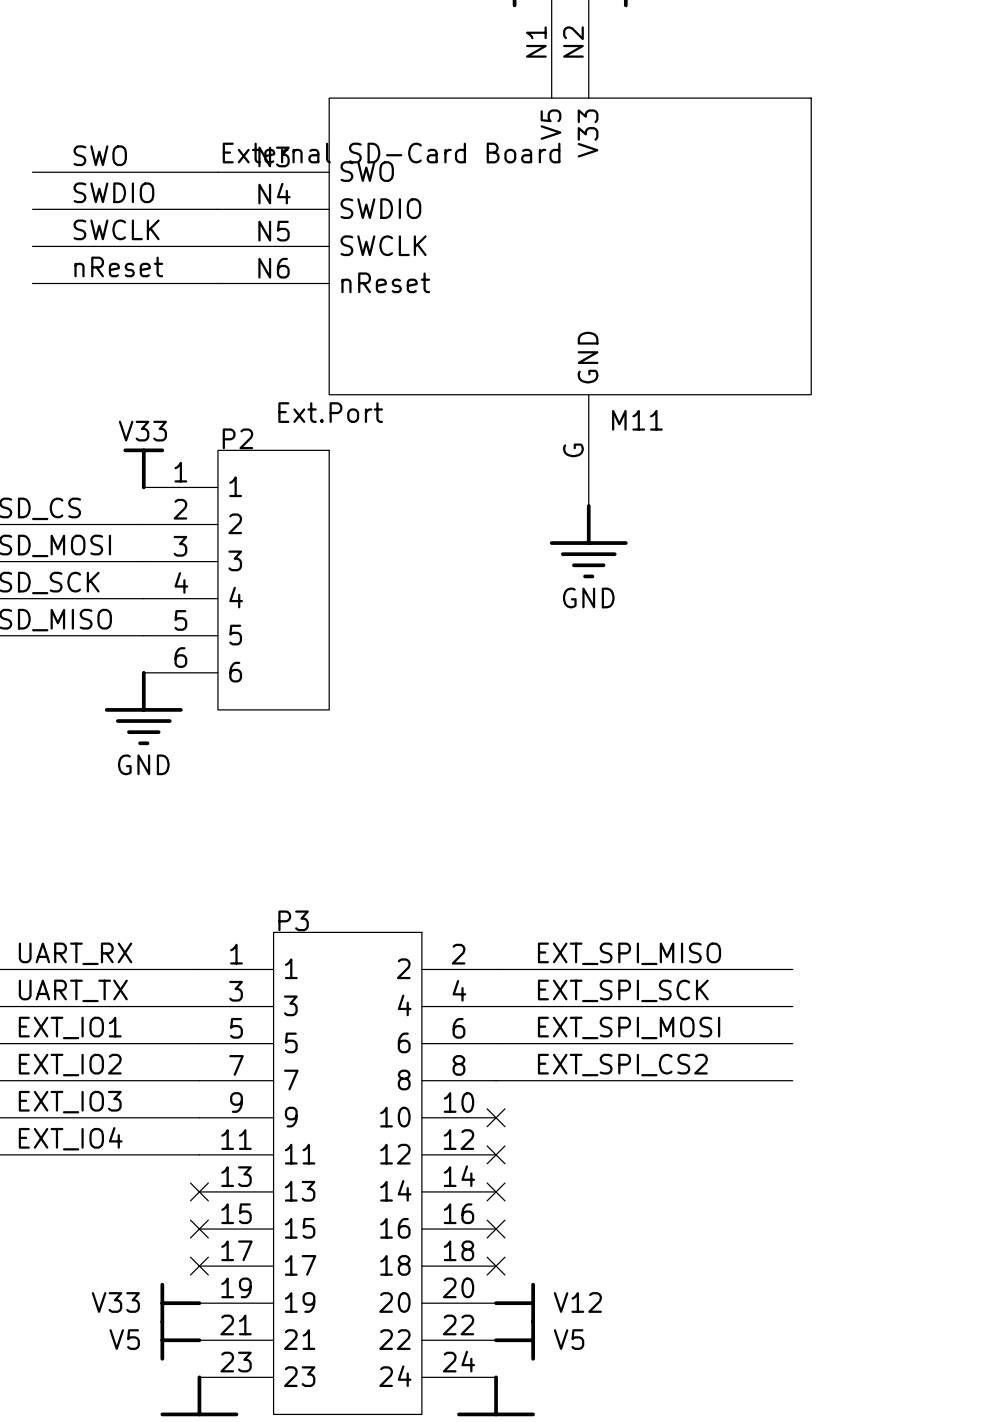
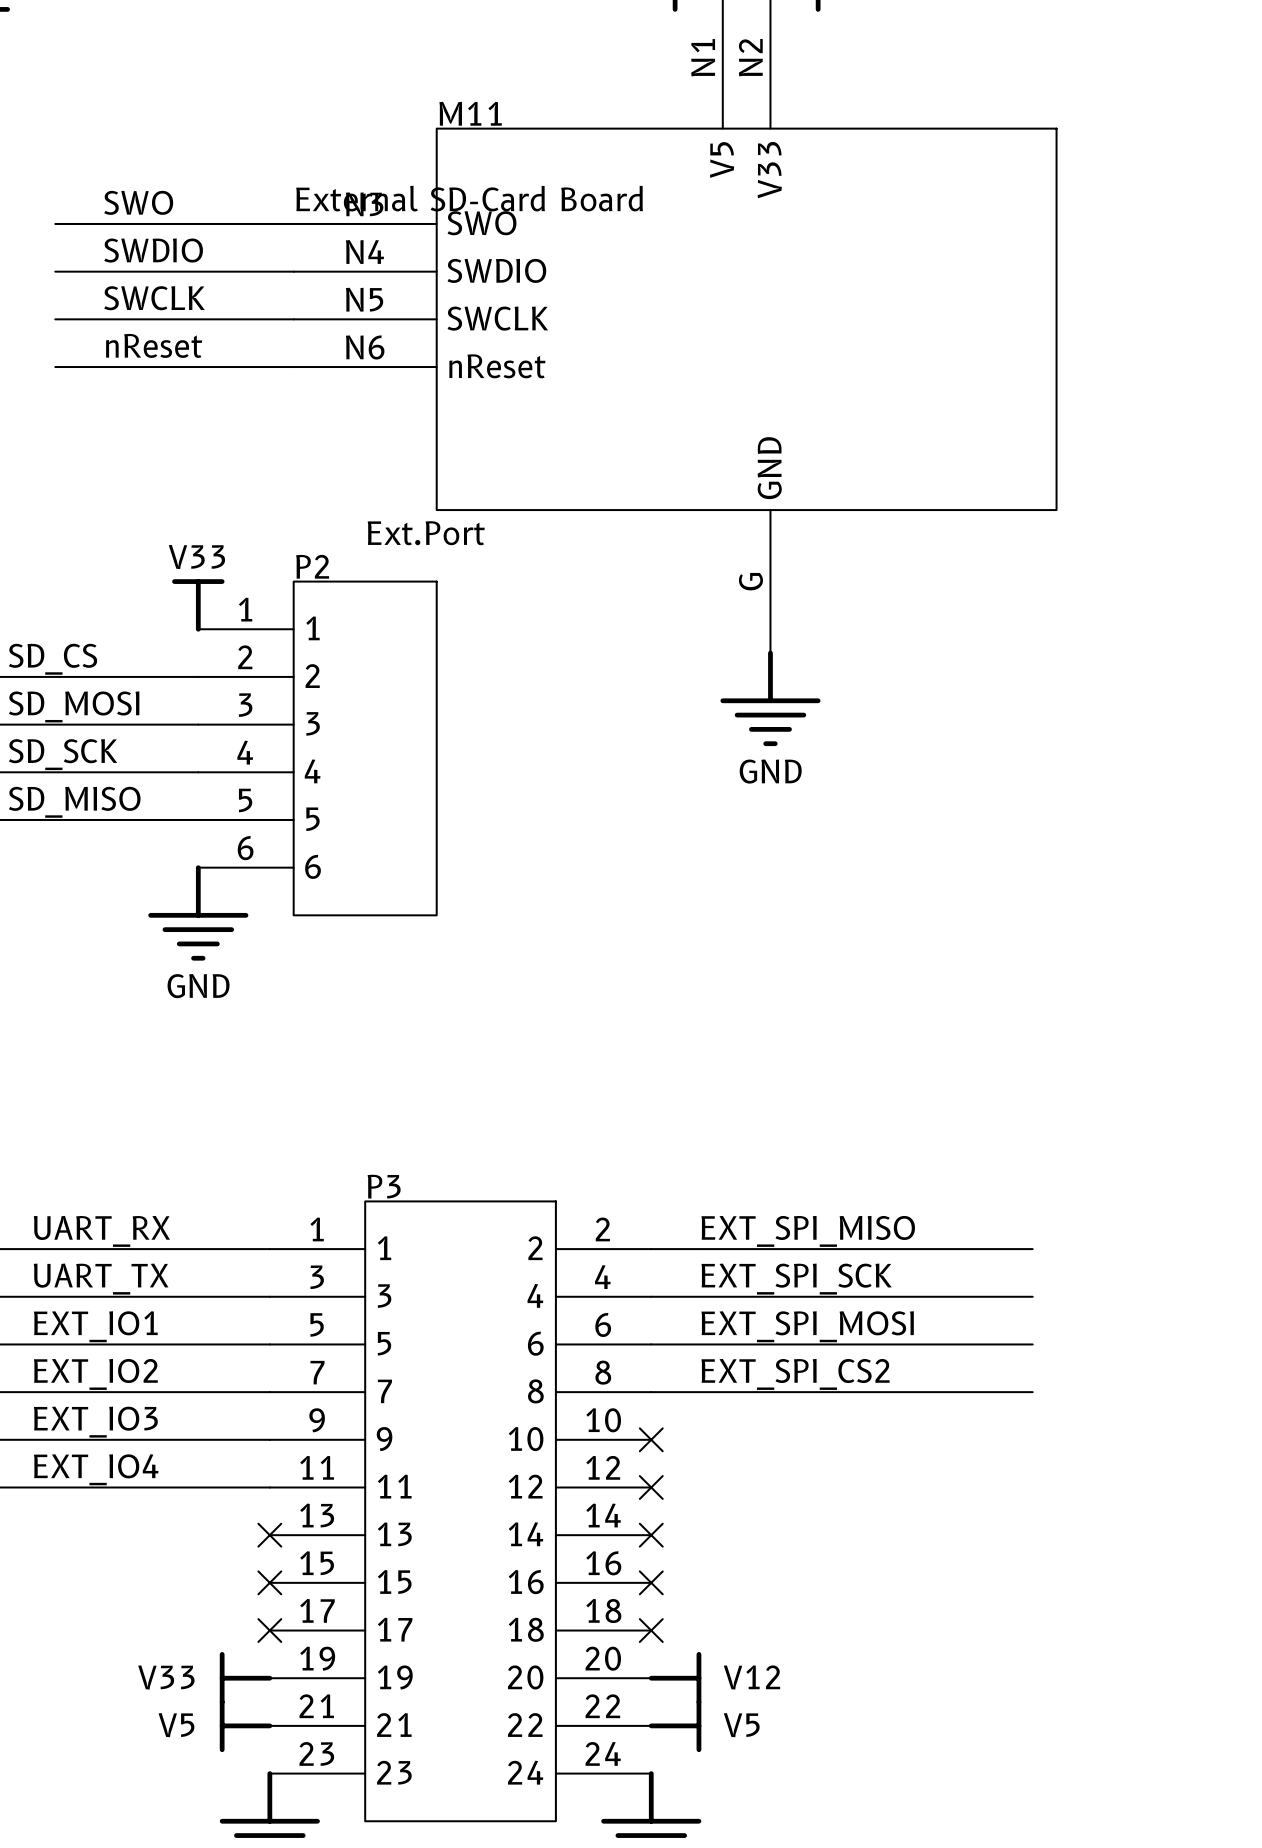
M11 name position: M11 (637, 420) -> M11 (470, 113)

